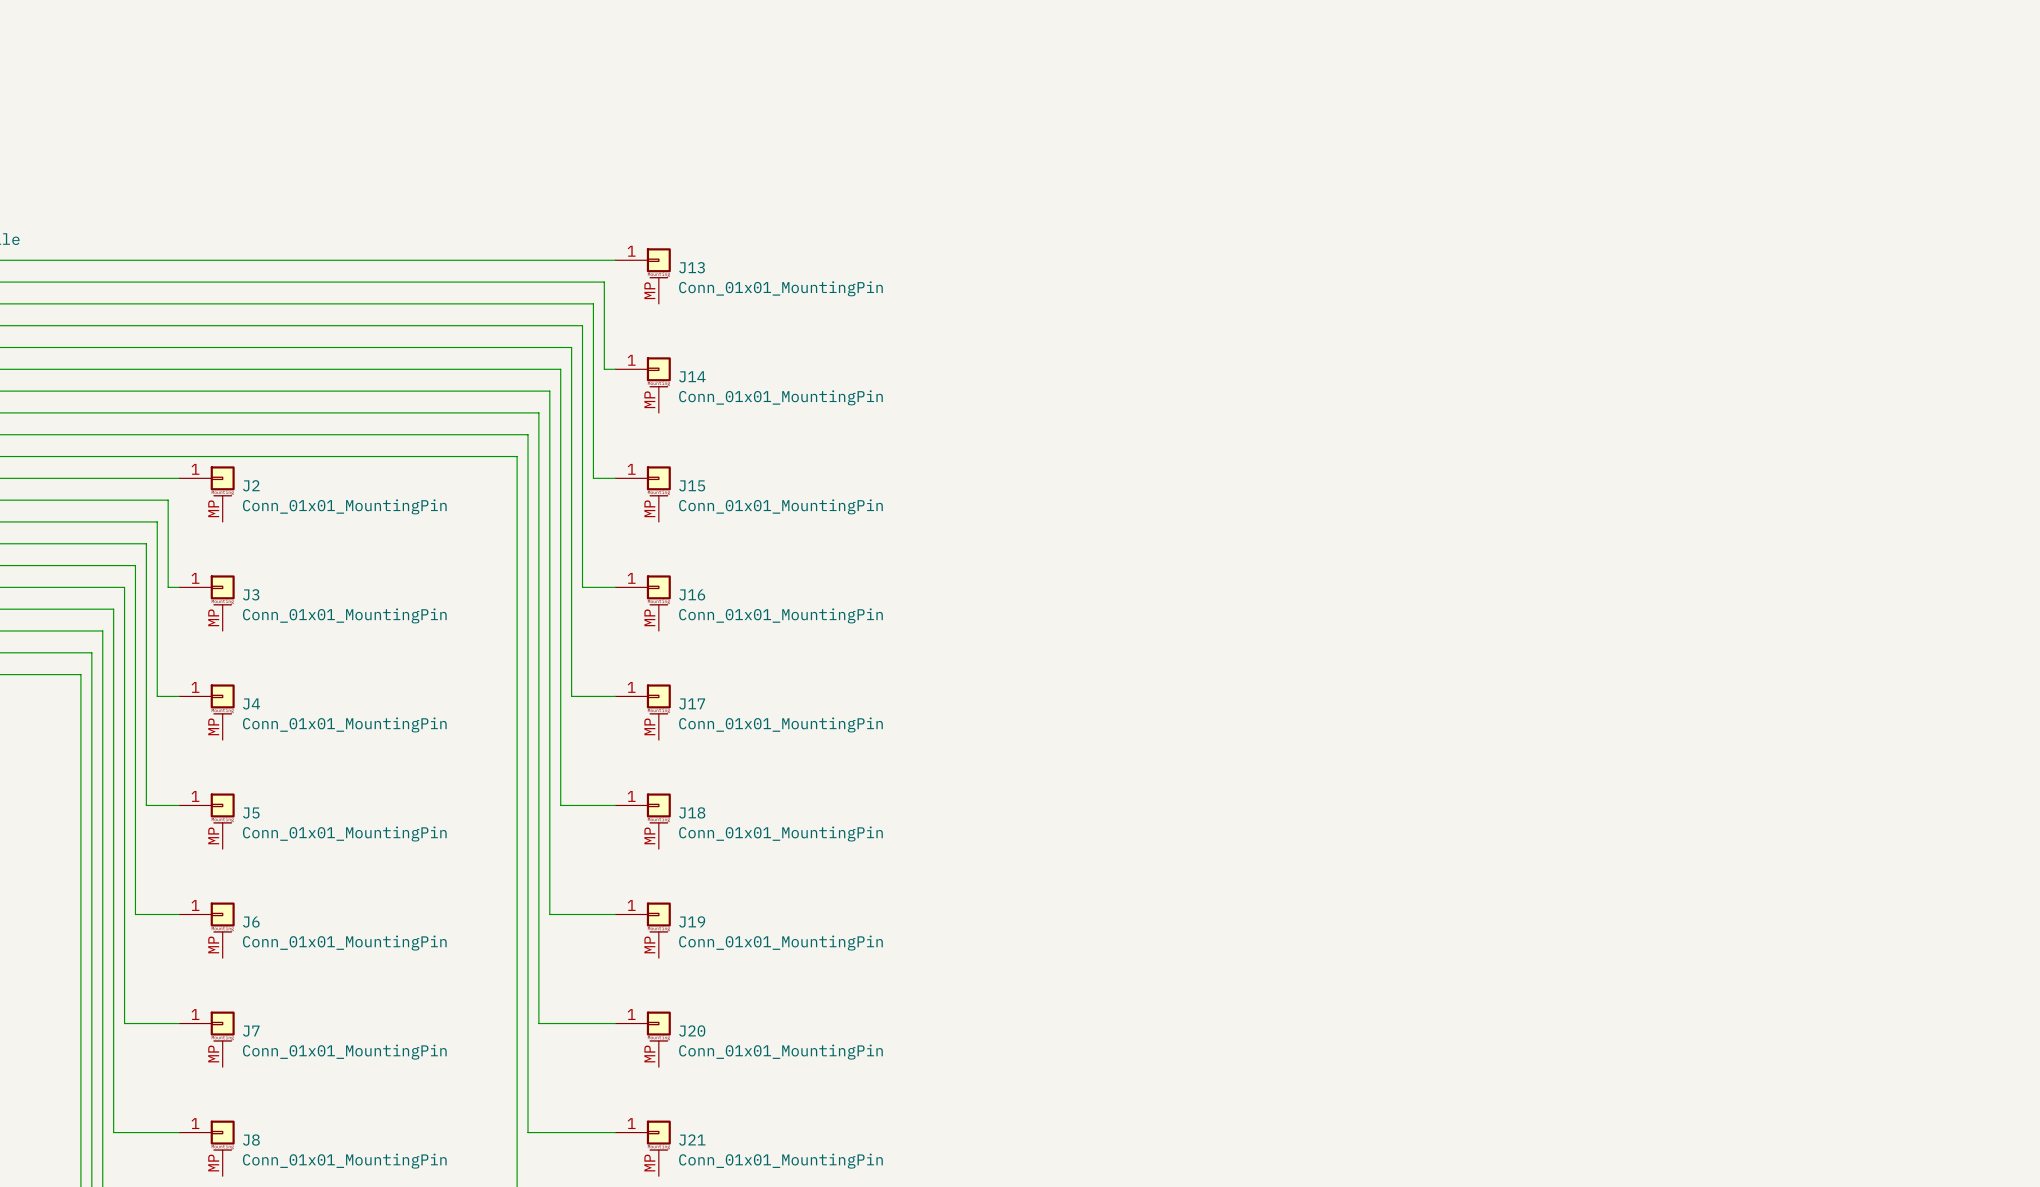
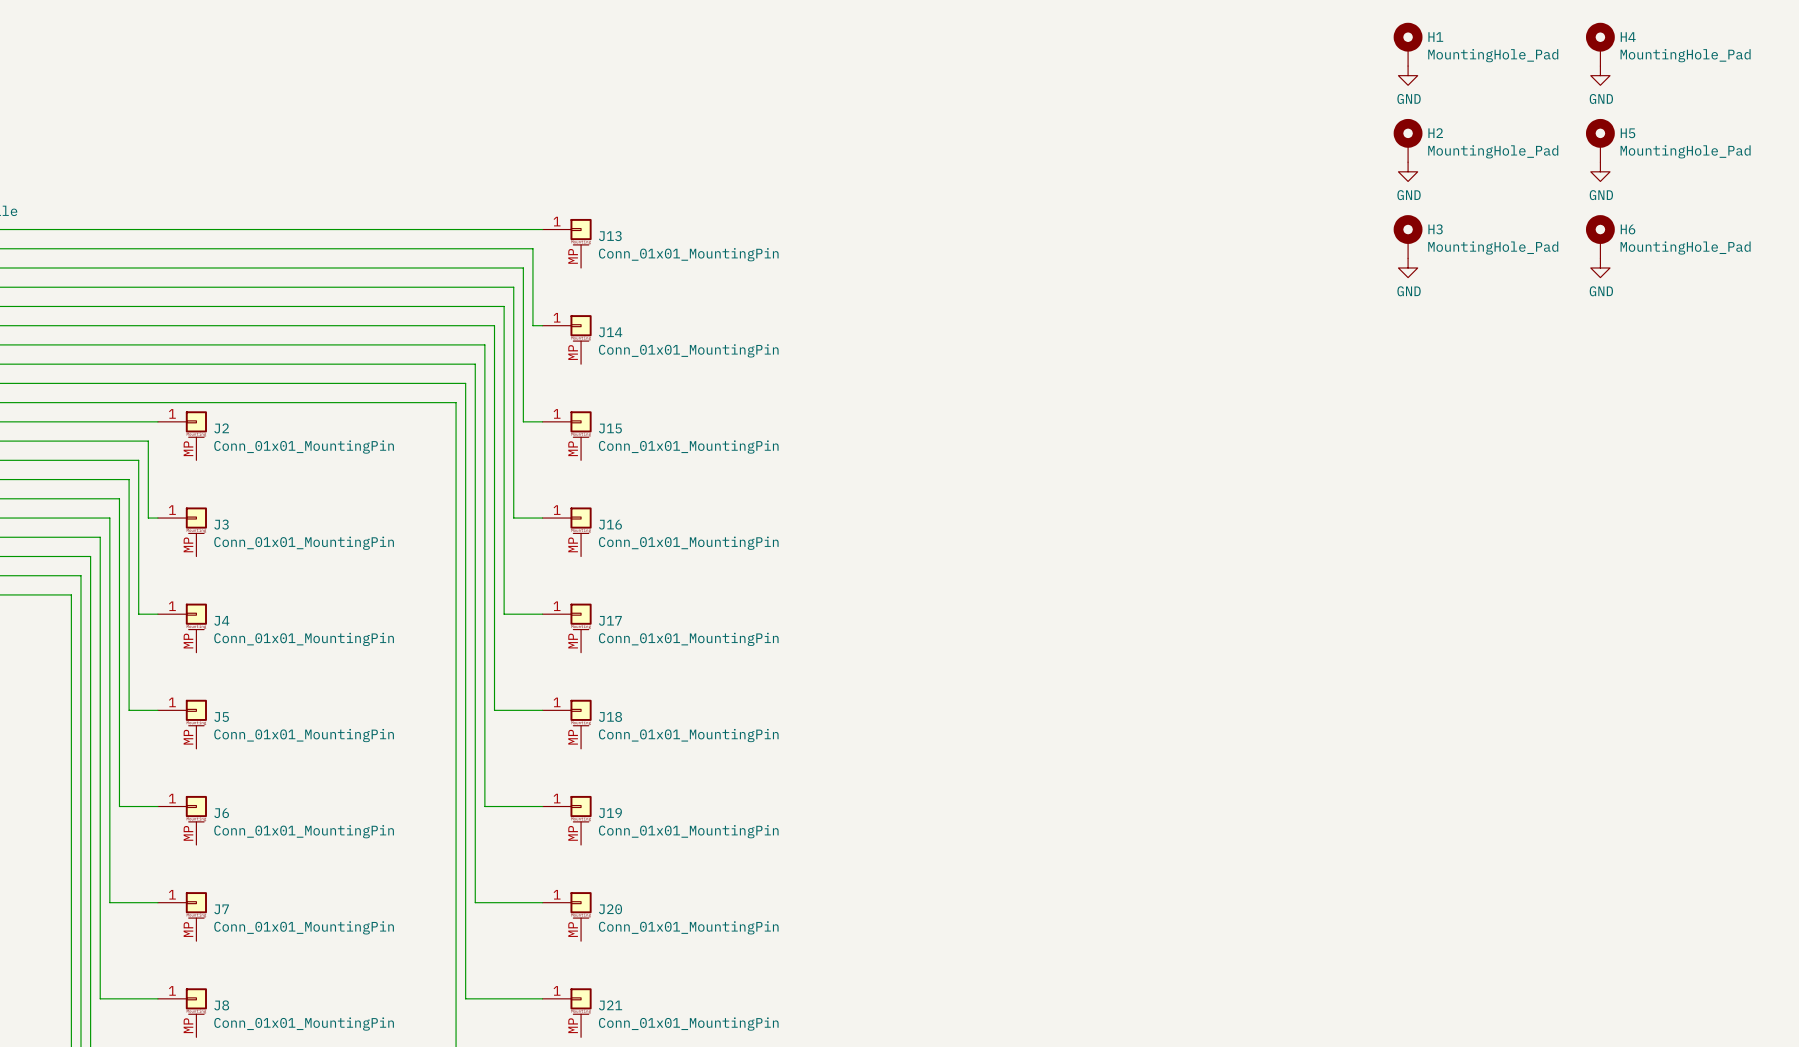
H1: none -> MountingHole_Pad (1408, 44)
H4: none -> MountingHole_Pad (1600, 44)
power symbol: none -> GND (1408, 75)
power symbol: none -> GND (1600, 75)
H2: none -> MountingHole_Pad (1408, 140)
H5: none -> MountingHole_Pad (1600, 140)
power symbol: none -> GND (1408, 171)
power symbol: none -> GND (1600, 171)
H3: none -> MountingHole_Pad (1408, 236)
H6: none -> MountingHole_Pad (1600, 236)
power symbol: none -> GND (1408, 267)
power symbol: none -> GND (1600, 267)

